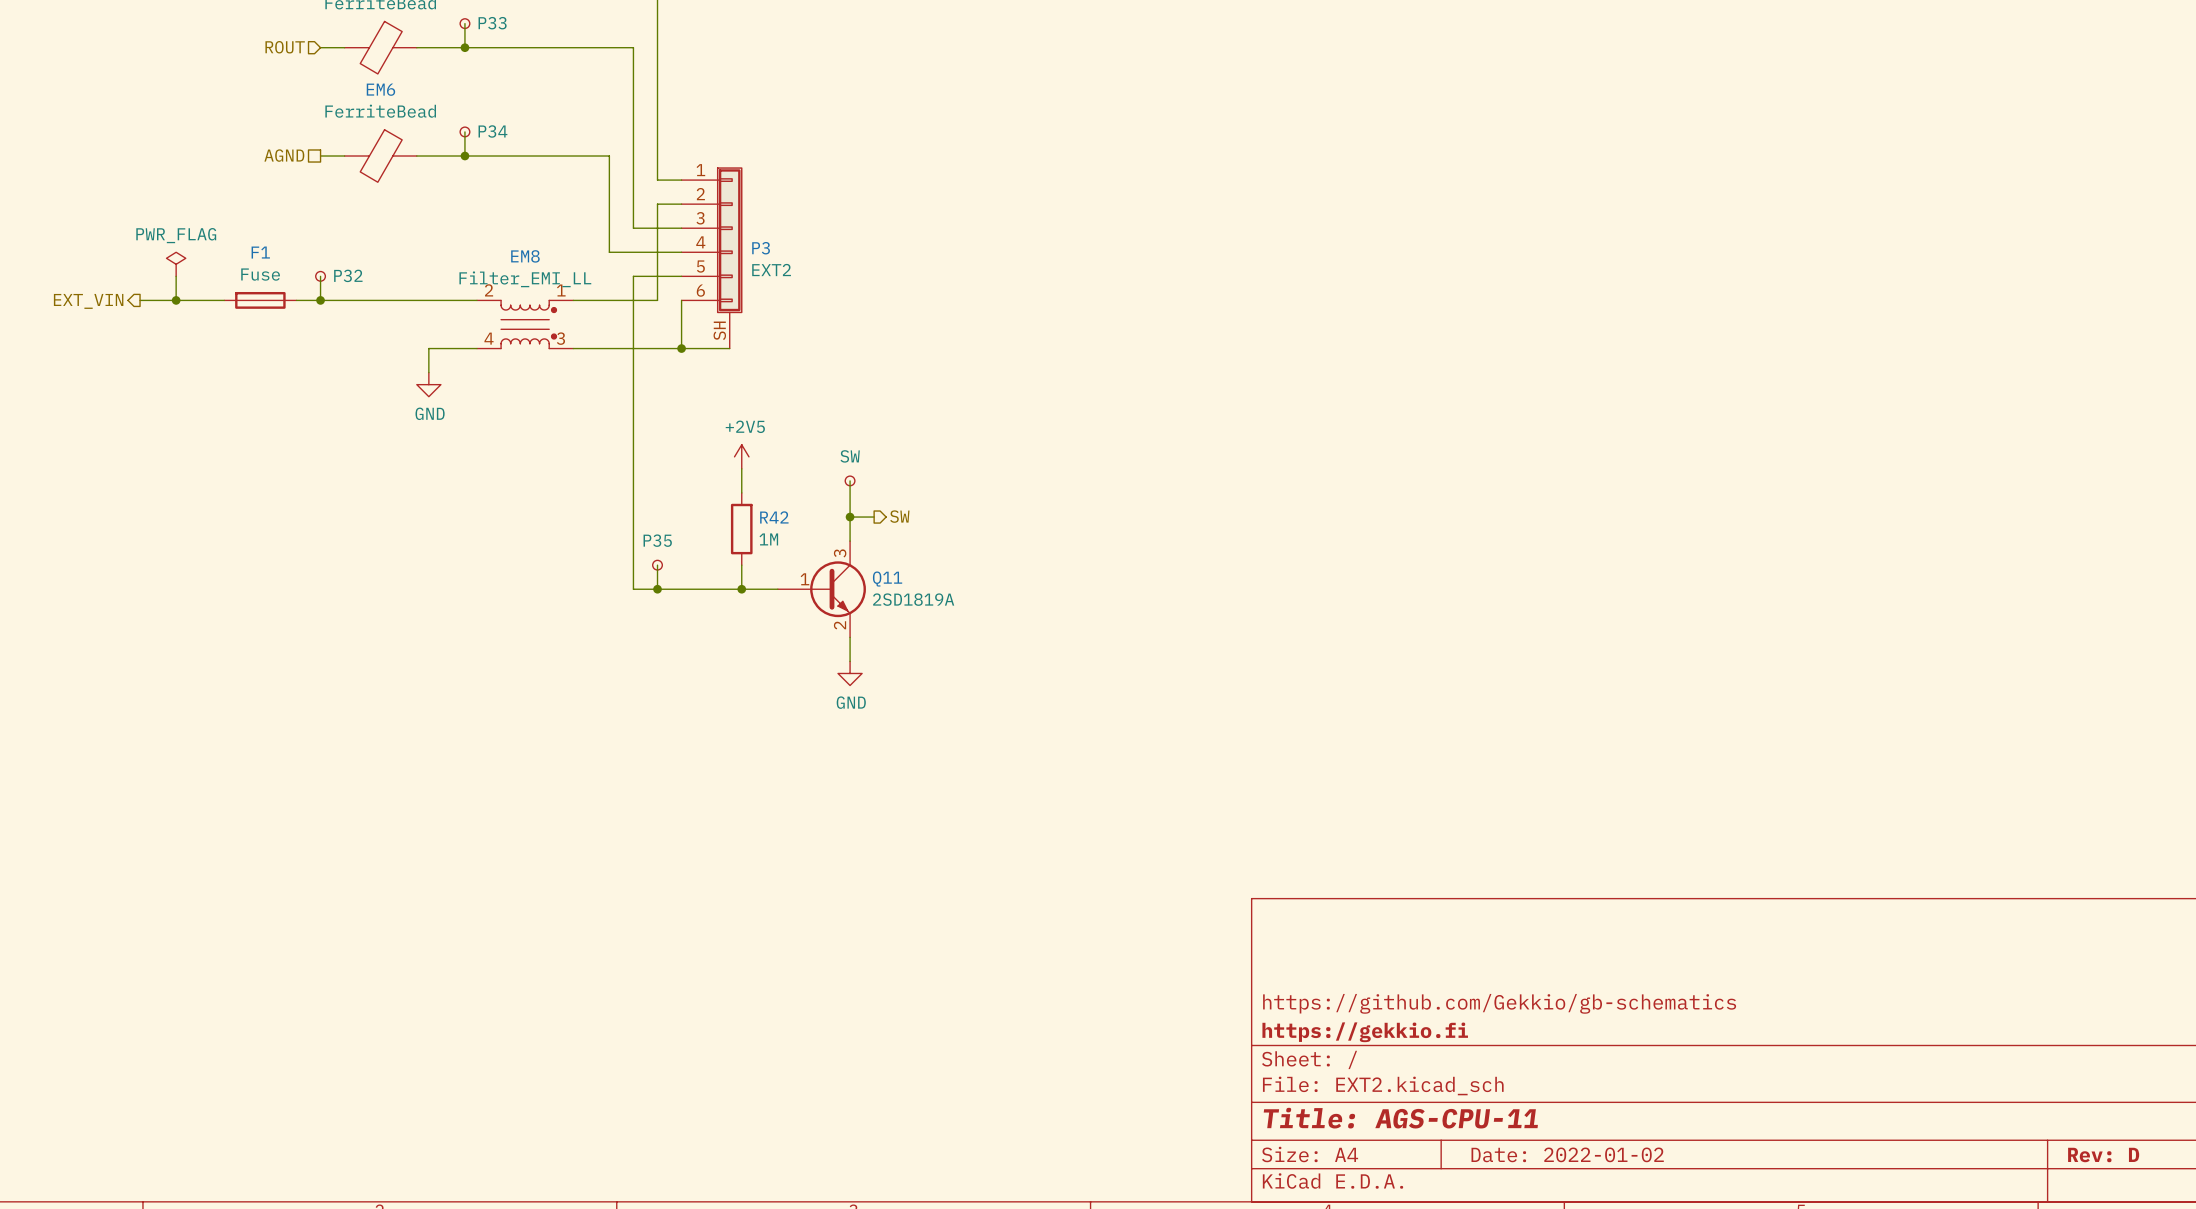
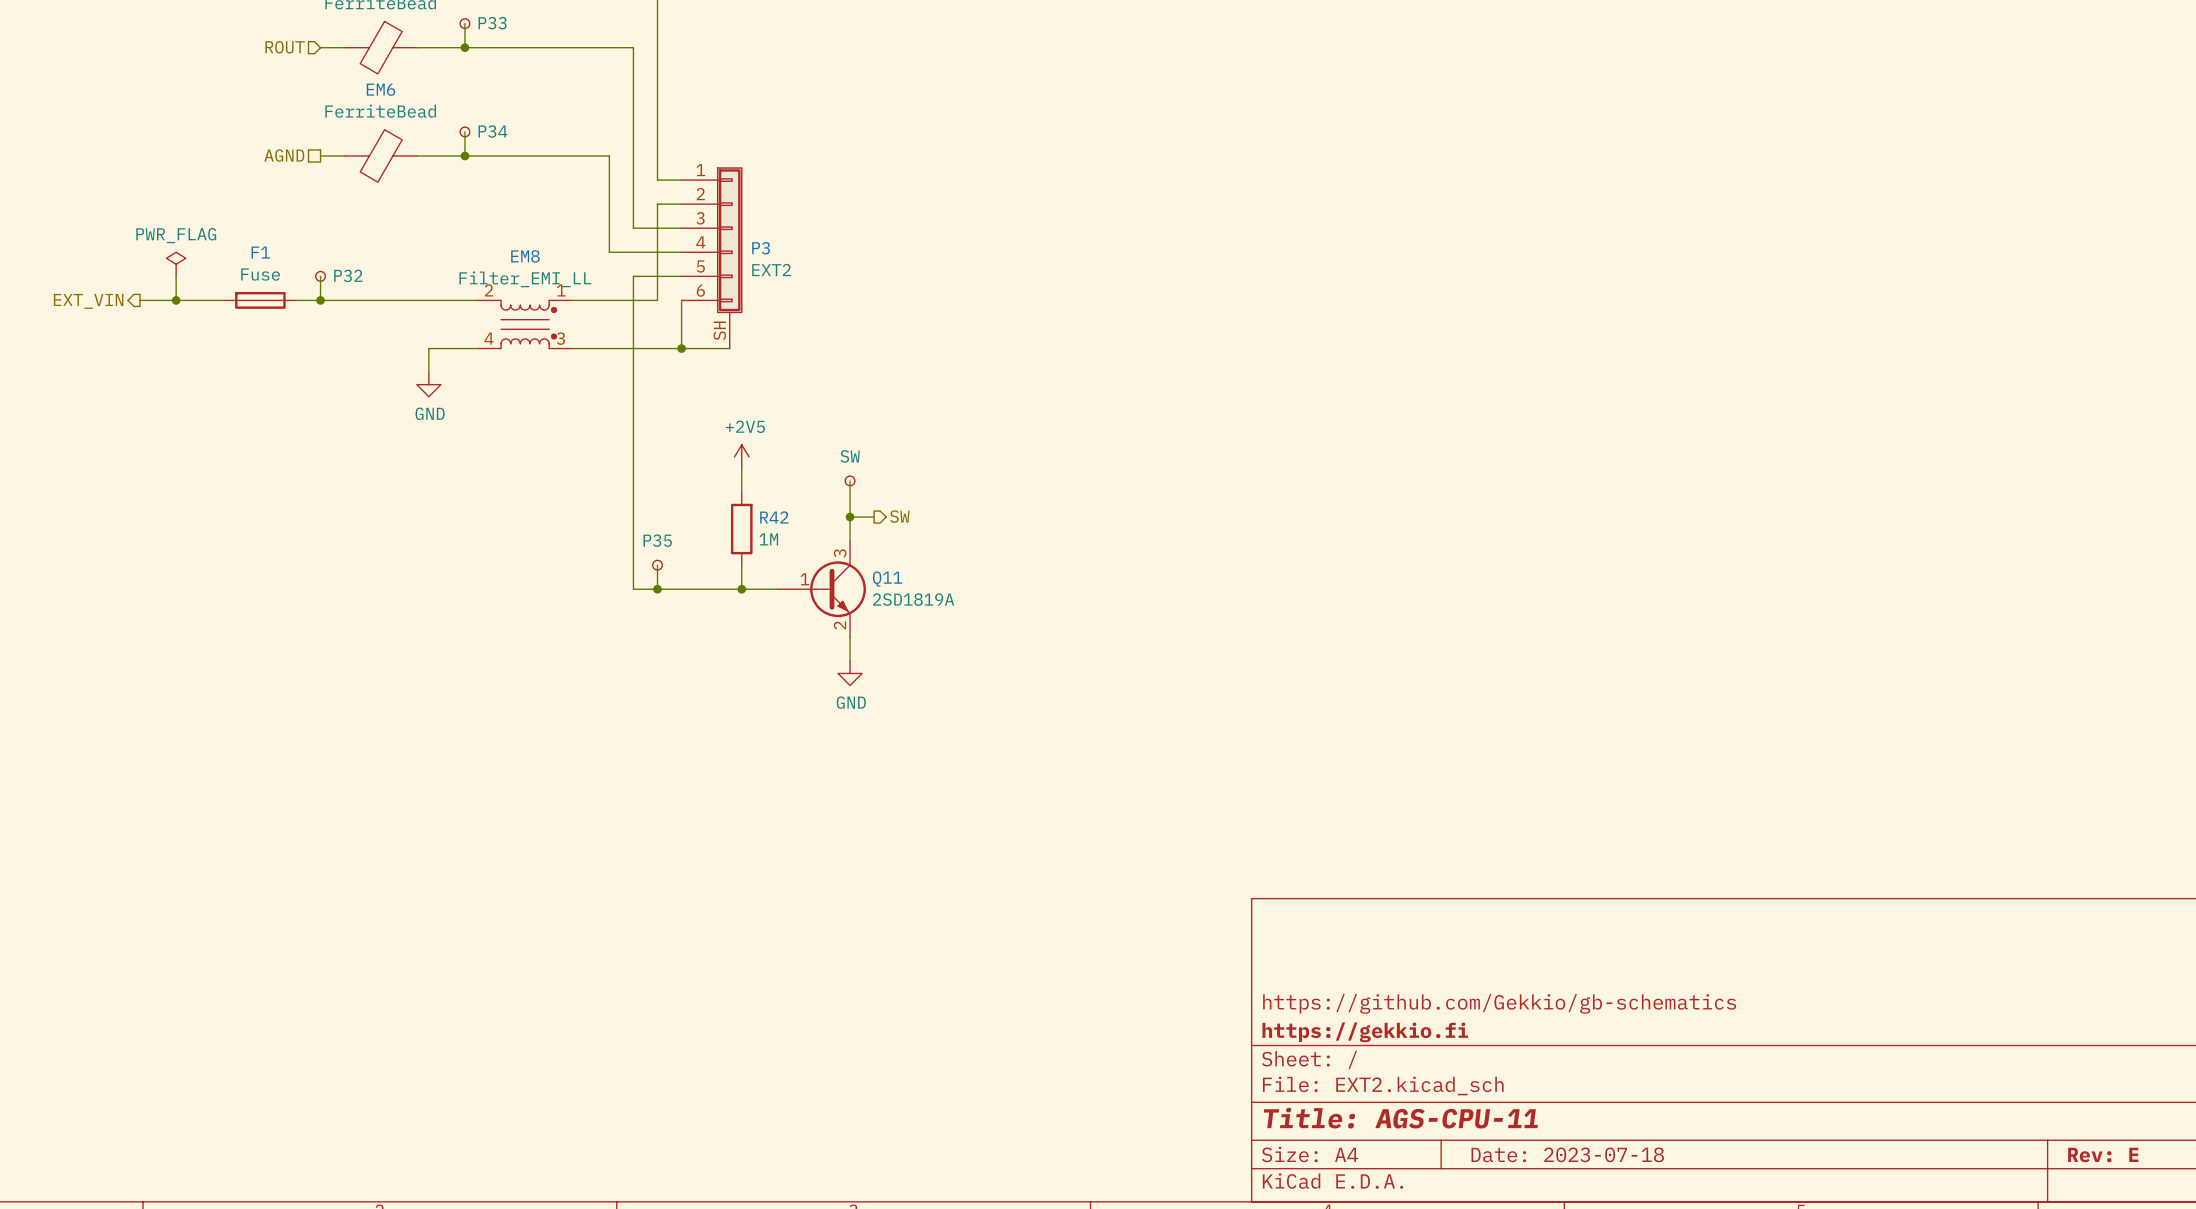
title block: Date: 2022-01-02 (1567, 1154) -> Date: 2023-07-18 (1567, 1154)
title block: Rev: D (2103, 1155) -> Rev: E (2103, 1155)

